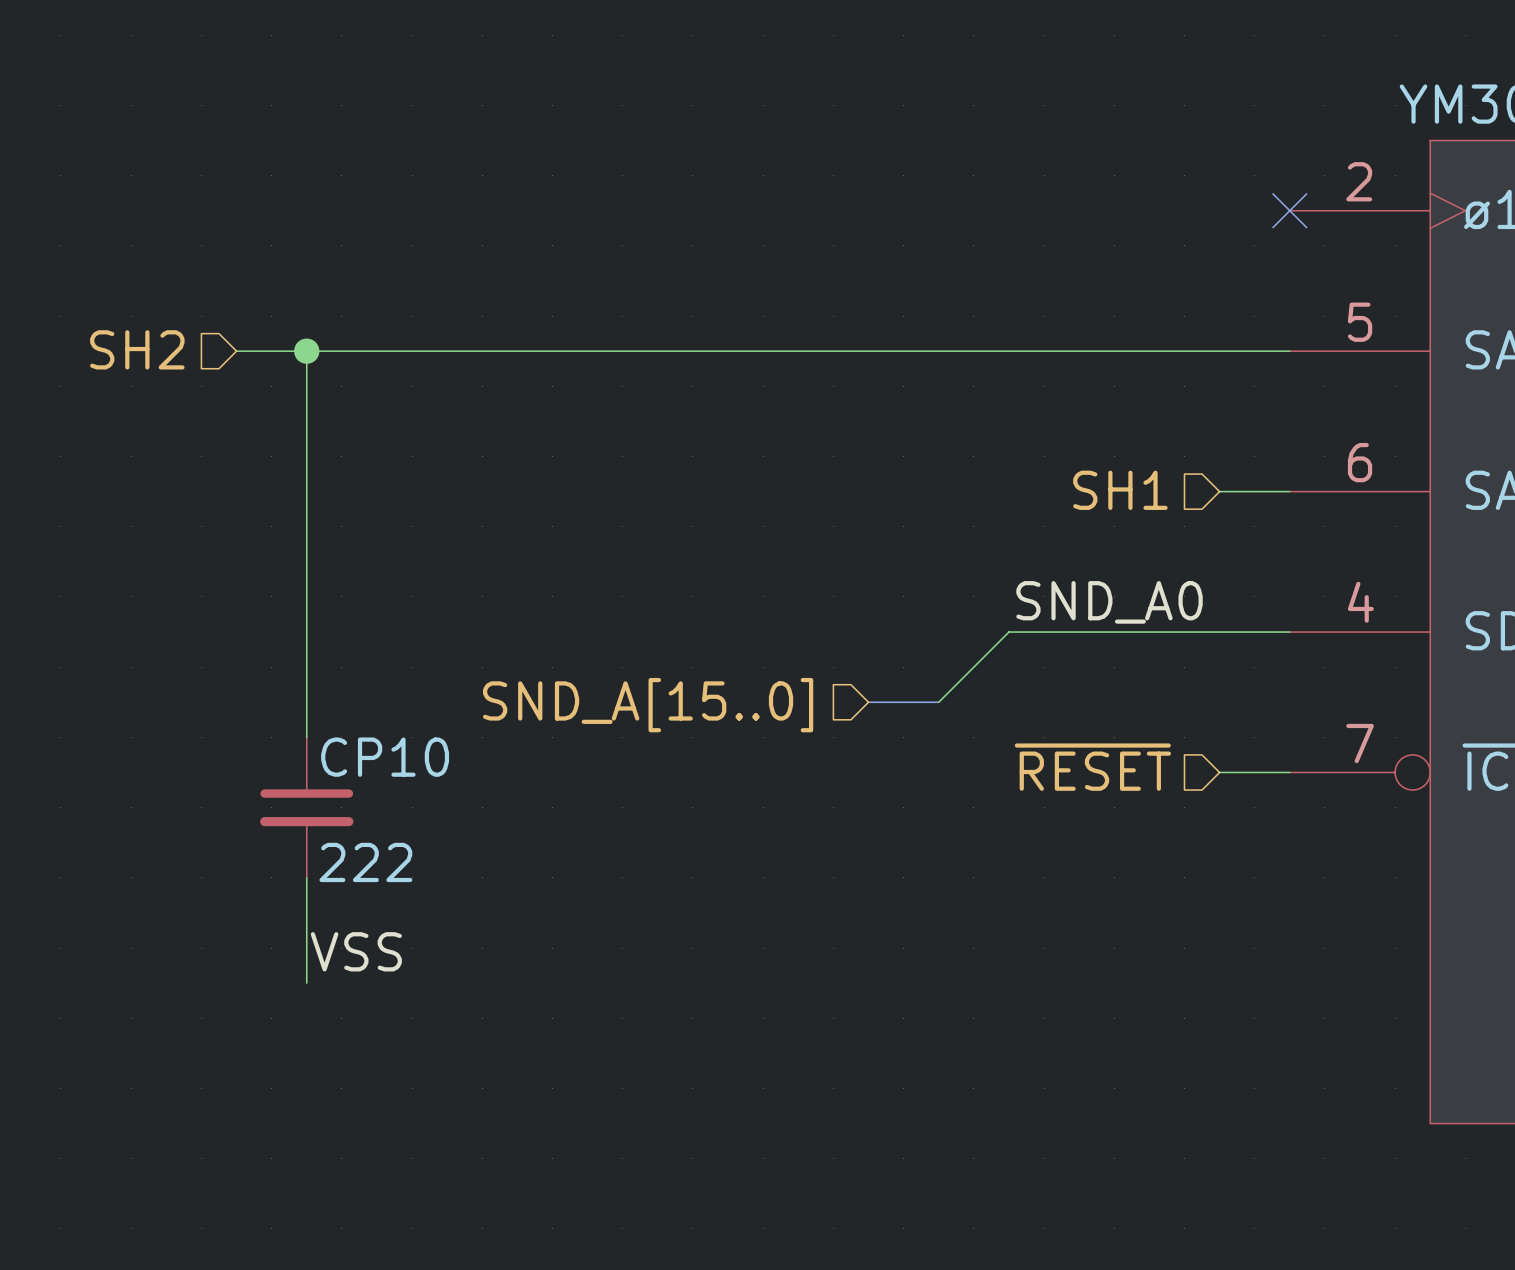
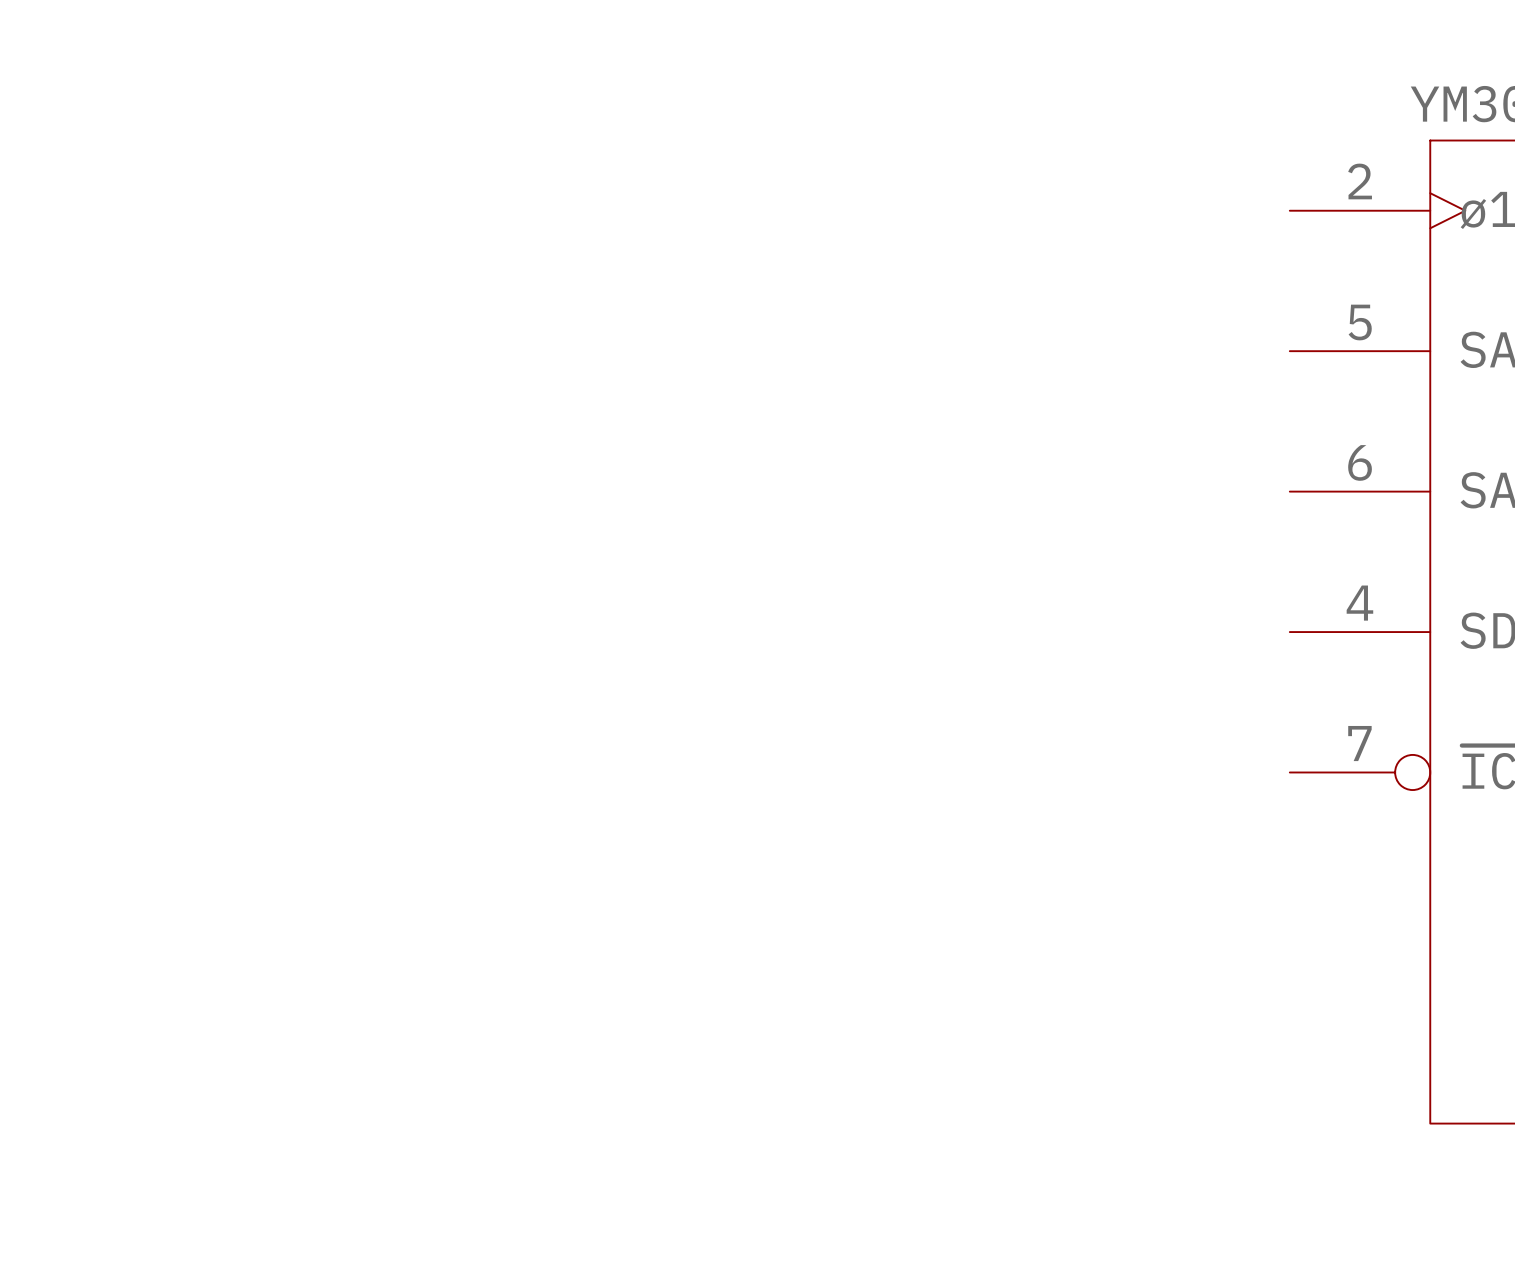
no-connect mark: (1289, 210) -> none
hierarchical label: SH2 (137, 349) -> none
wire: (236, 351) (1289, 351) -> none
wire: (306, 351) (306, 737) -> none
junction: (306, 351) -> none
hierarchical label: SH1 (1120, 490) -> none
wire: (1219, 491) (1289, 491) -> none
label: SND_A0 (1109, 602) -> none
wire: (1289, 632) (1008, 632) (938, 702) -> none
bus: (868, 702) (938, 702) -> none
hierarchical label: SND_A[15..0] (648, 705) -> none
hierarchical label: ~{RESET} (1092, 767) -> none
wire: (1219, 772) (1289, 772) -> none
CP10: 222 (306, 807) -> none
wire: (306, 877) (306, 983) -> none
label: VSS (356, 951) -> none

